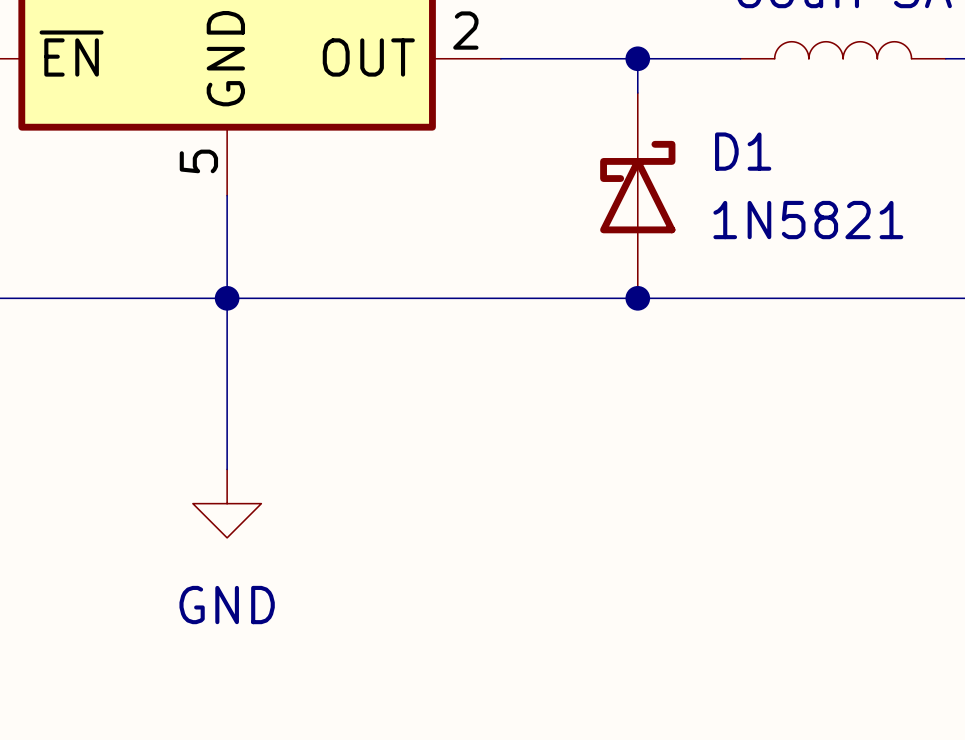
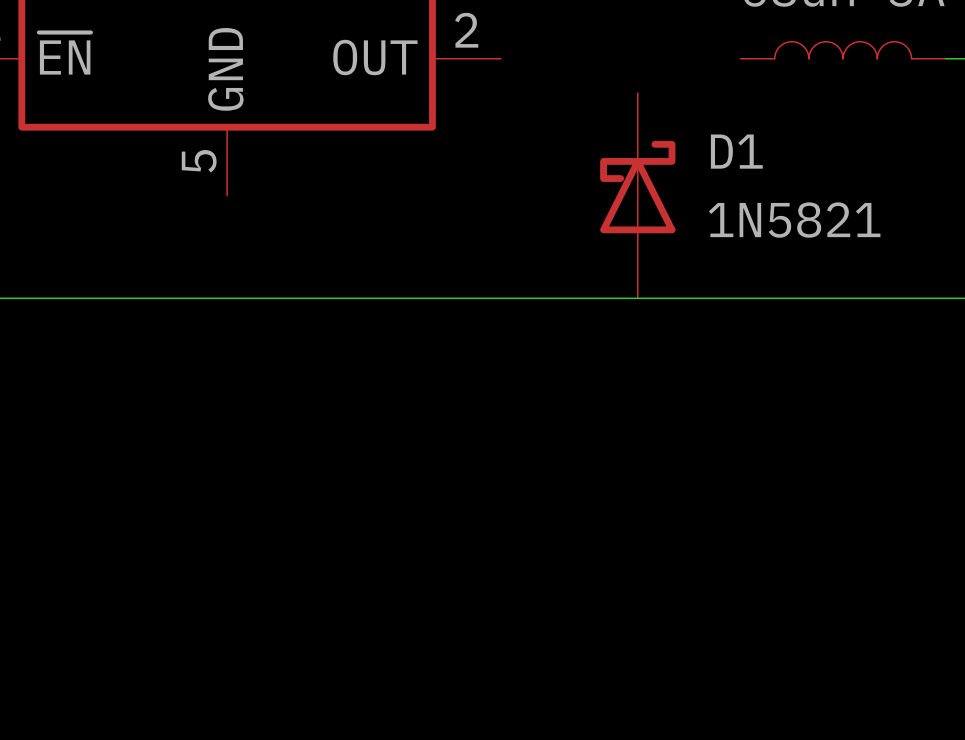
wire: (500, 58) (740, 58) -> none
wire: (637, 58) (637, 92) -> none
junction: (637, 58) -> none
wire: (227, 195) (227, 469) -> none
junction: (227, 298) -> none
junction: (637, 298) -> none
power symbol: GND (227, 503) -> none

